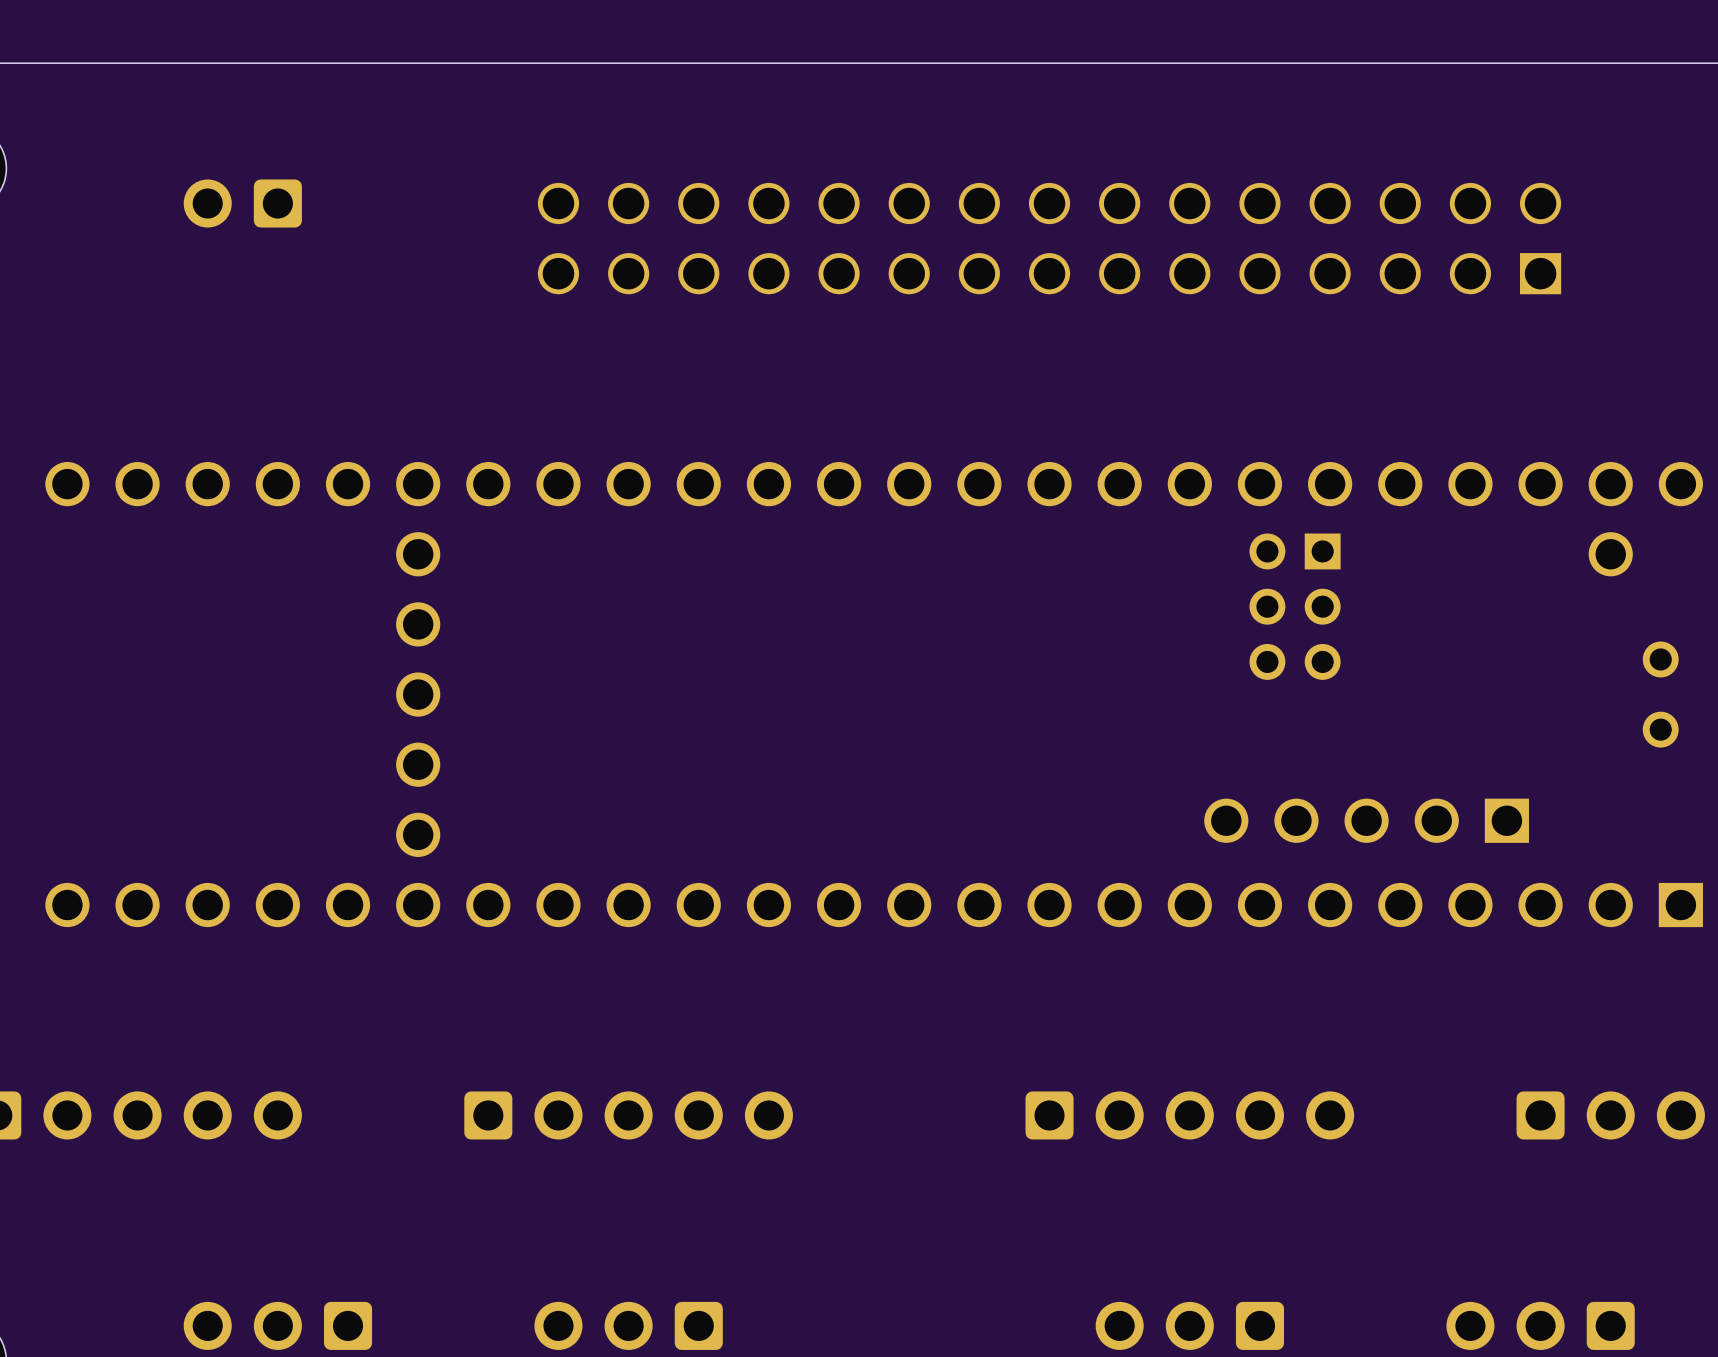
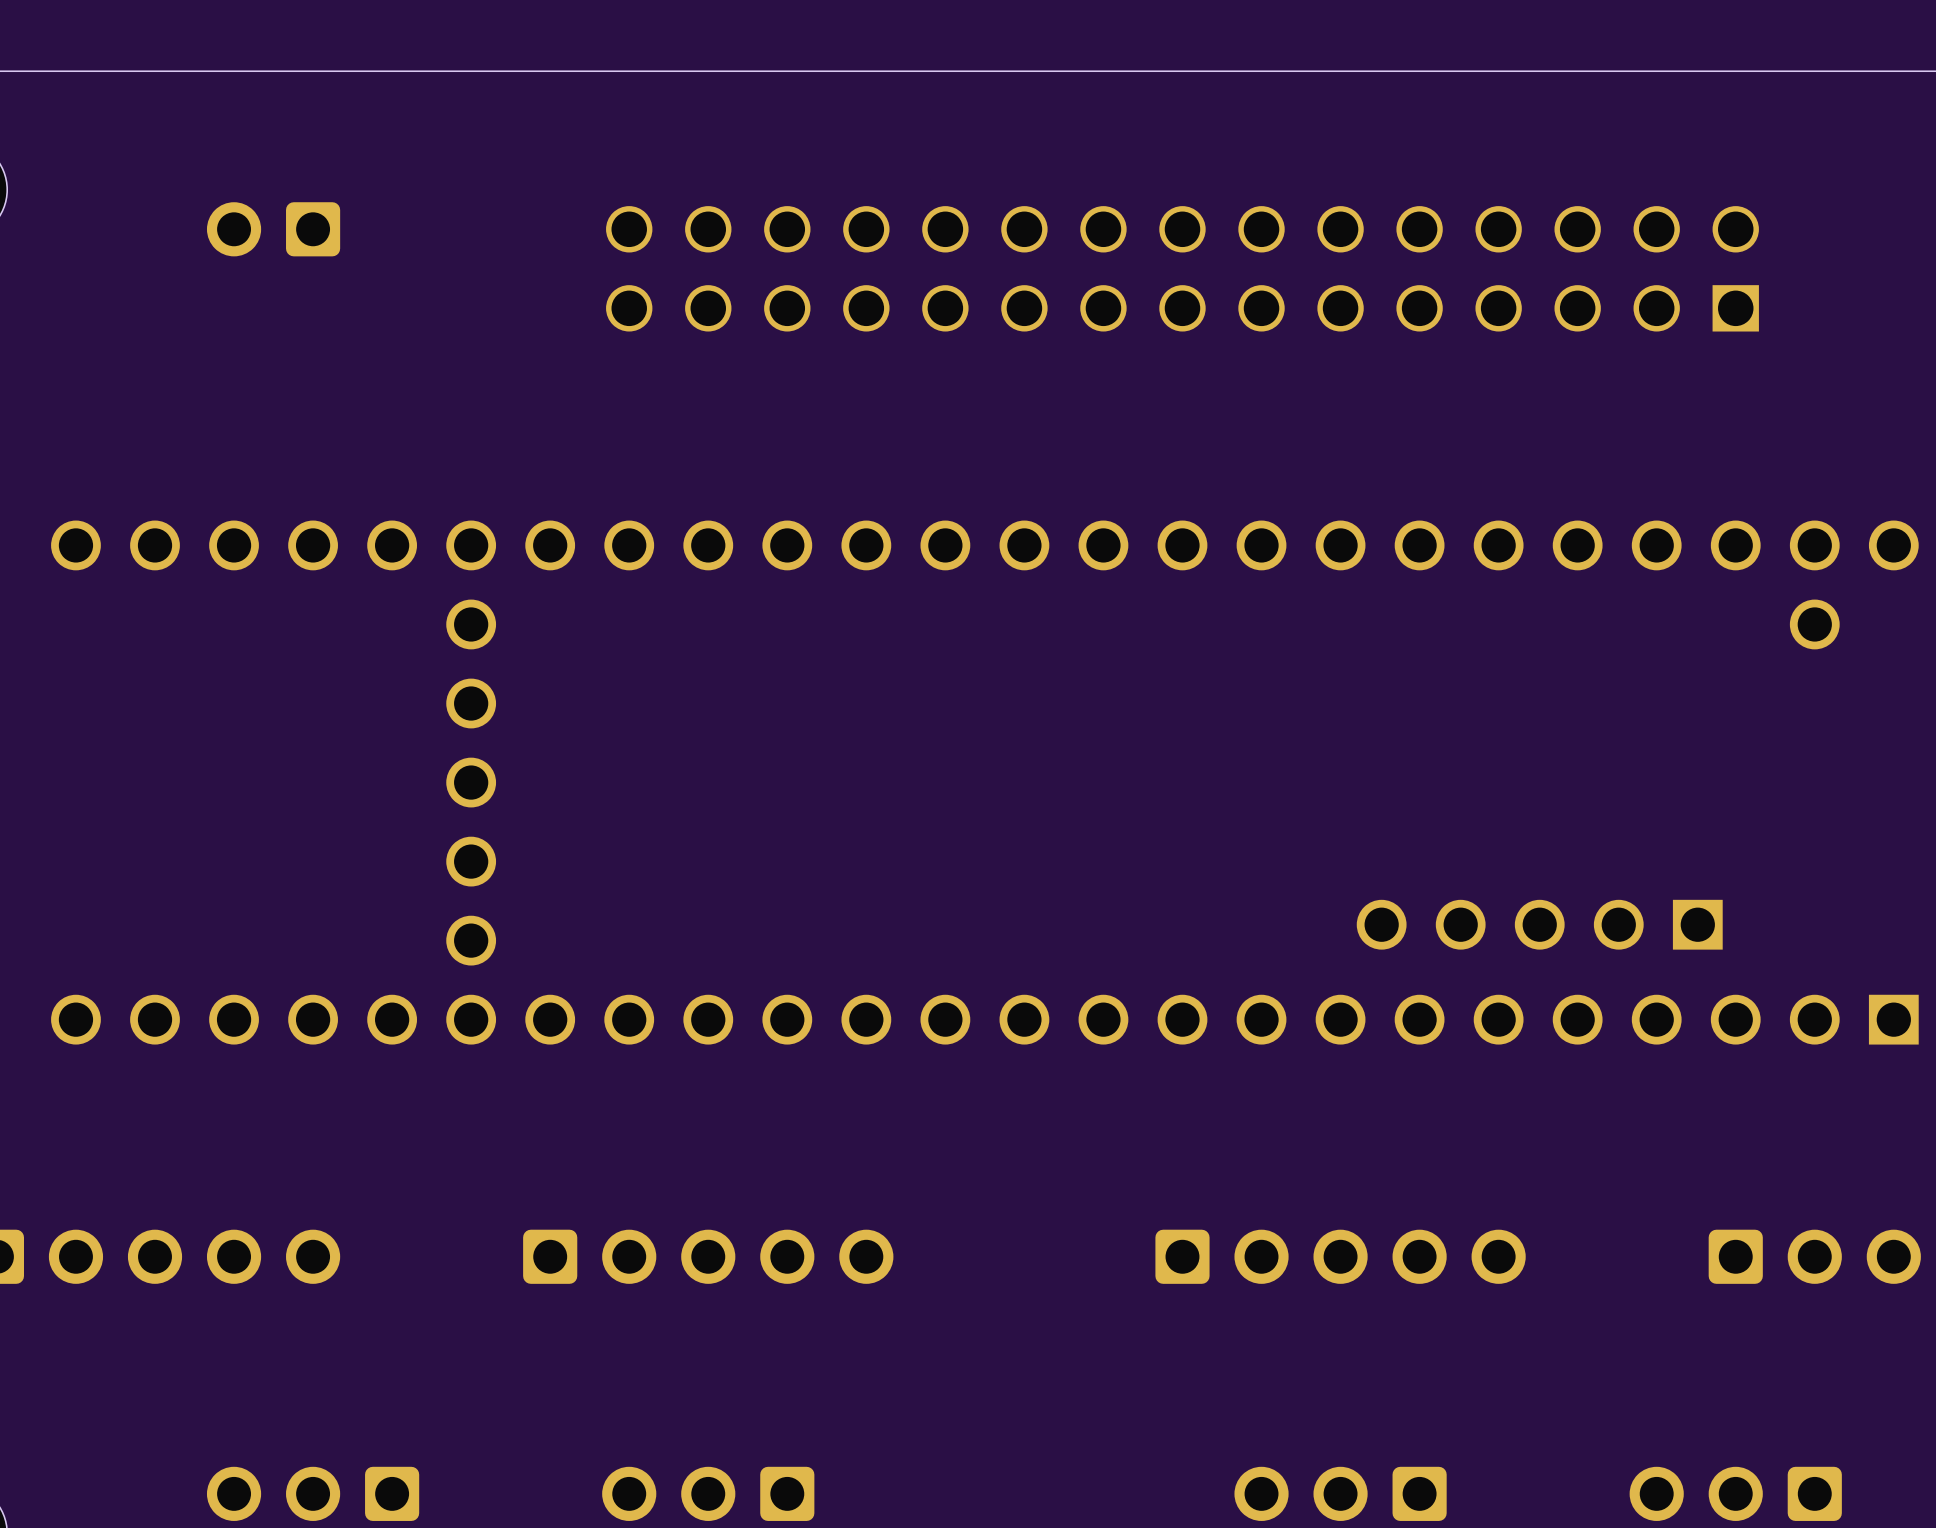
part footprint: [45, 462, 1703, 928] -> [51, 520, 1919, 1045]

